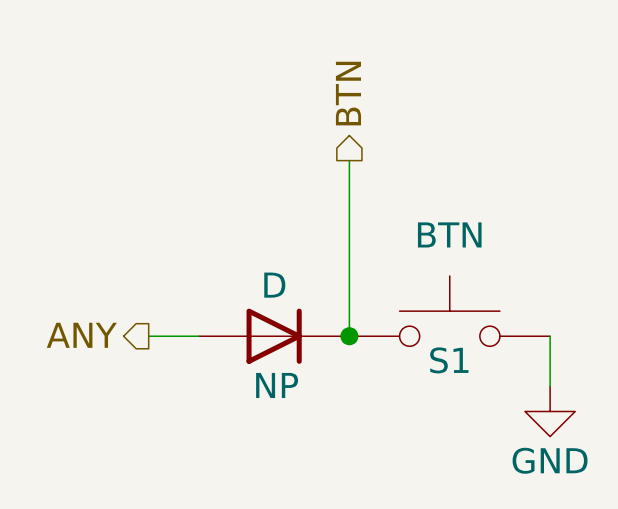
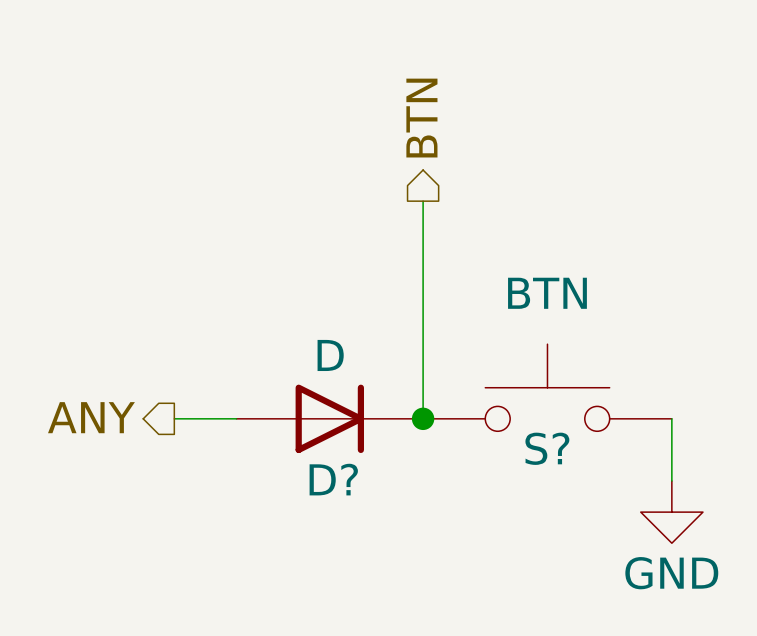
S1 name: S1 (449, 360) -> S? (547, 448)
NP name: NP (277, 385) -> D? (333, 479)

